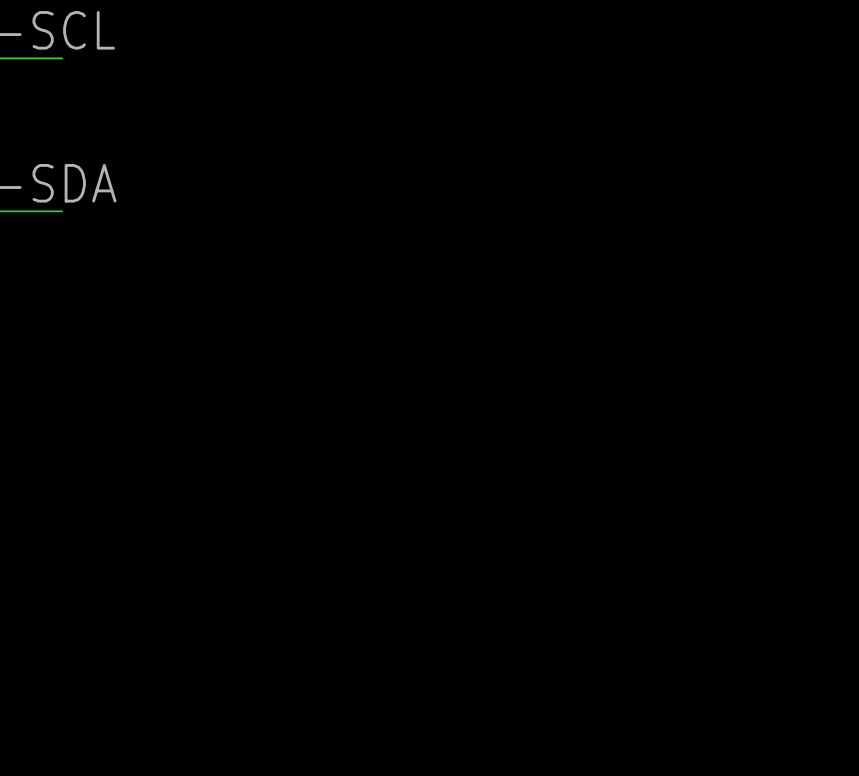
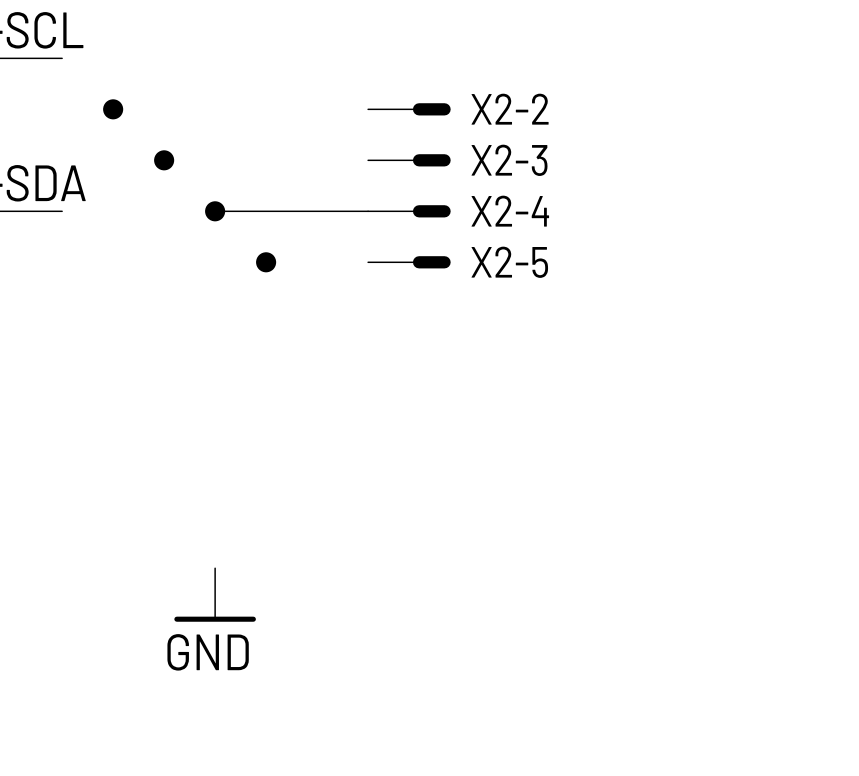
junction: none -> (113, 109)
X2-2: none -> (409, 109)
junction: none -> (164, 160)
X2-3: none -> (409, 160)
wire: none -> (215, 211) (368, 211)
junction: none -> (215, 211)
X2-4: none -> (409, 211)
junction: none -> (266, 262)
X2-5: none -> (409, 262)
power symbol: none -> GND (215, 594)

